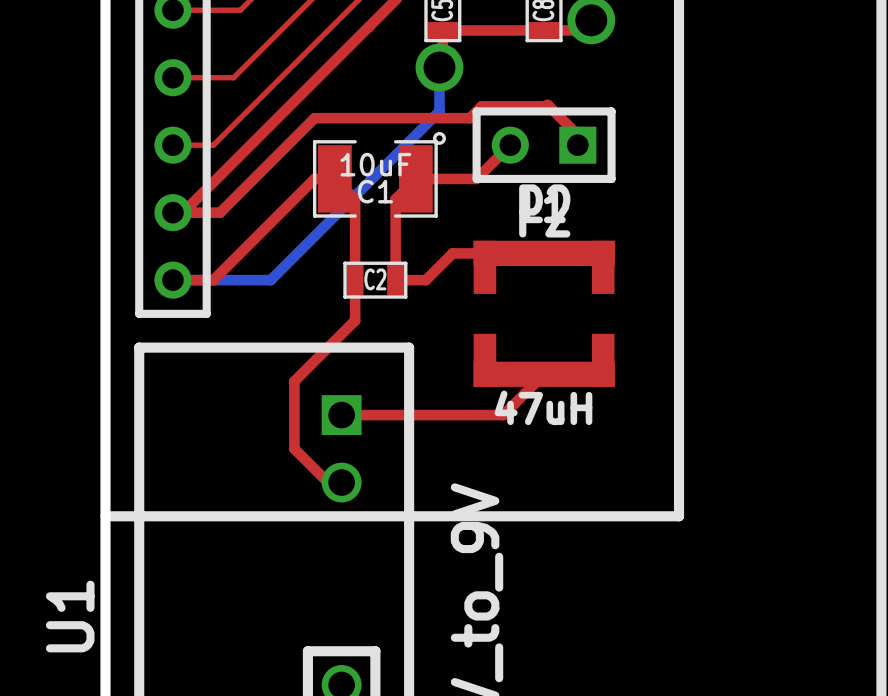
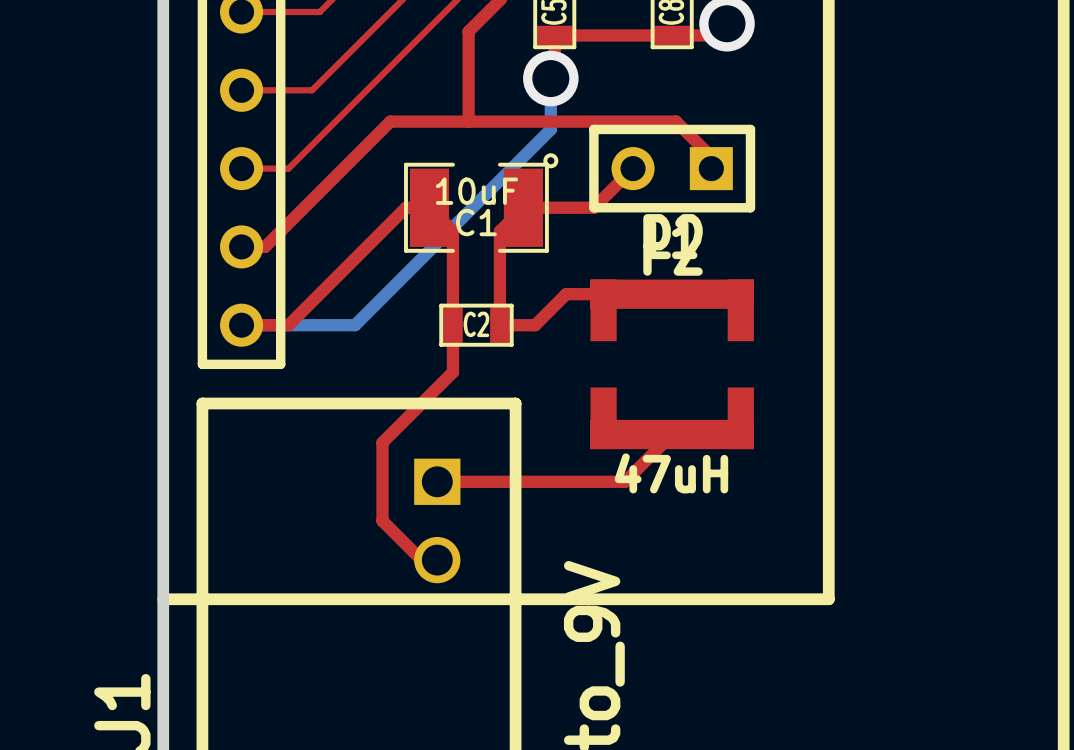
top track: (368, 27) (183, 212) -> (468, 31) (468, 121)
top track: (549, 106) (481, 106) (469, 118) (314, 118) (220, 212) (193, 212) -> (676, 121) (390, 121) (265, 246)

